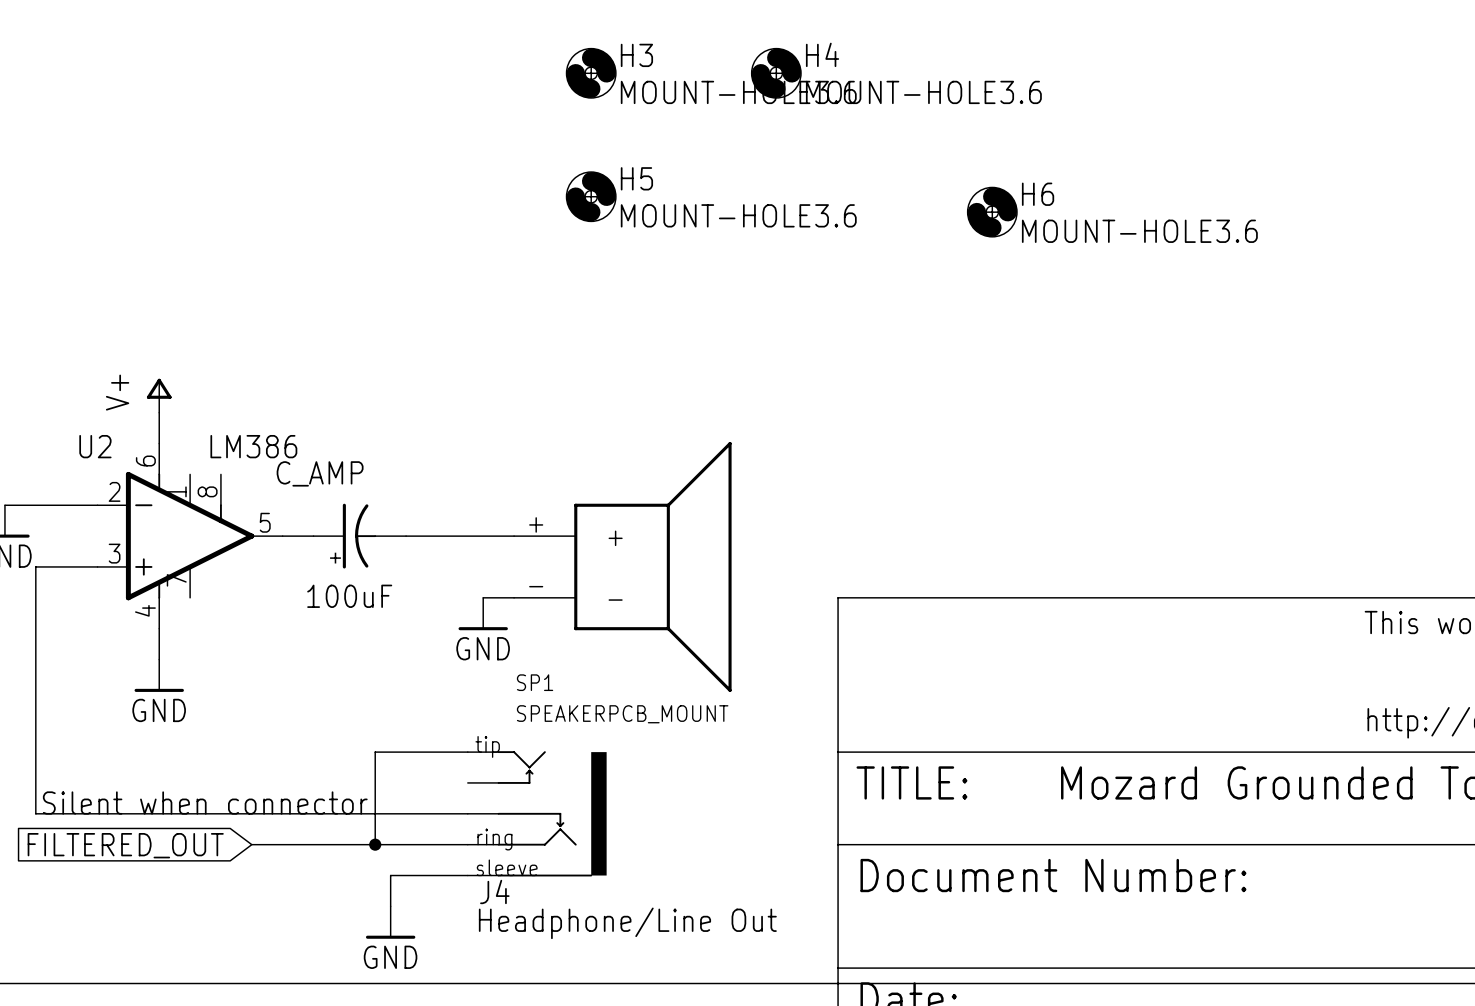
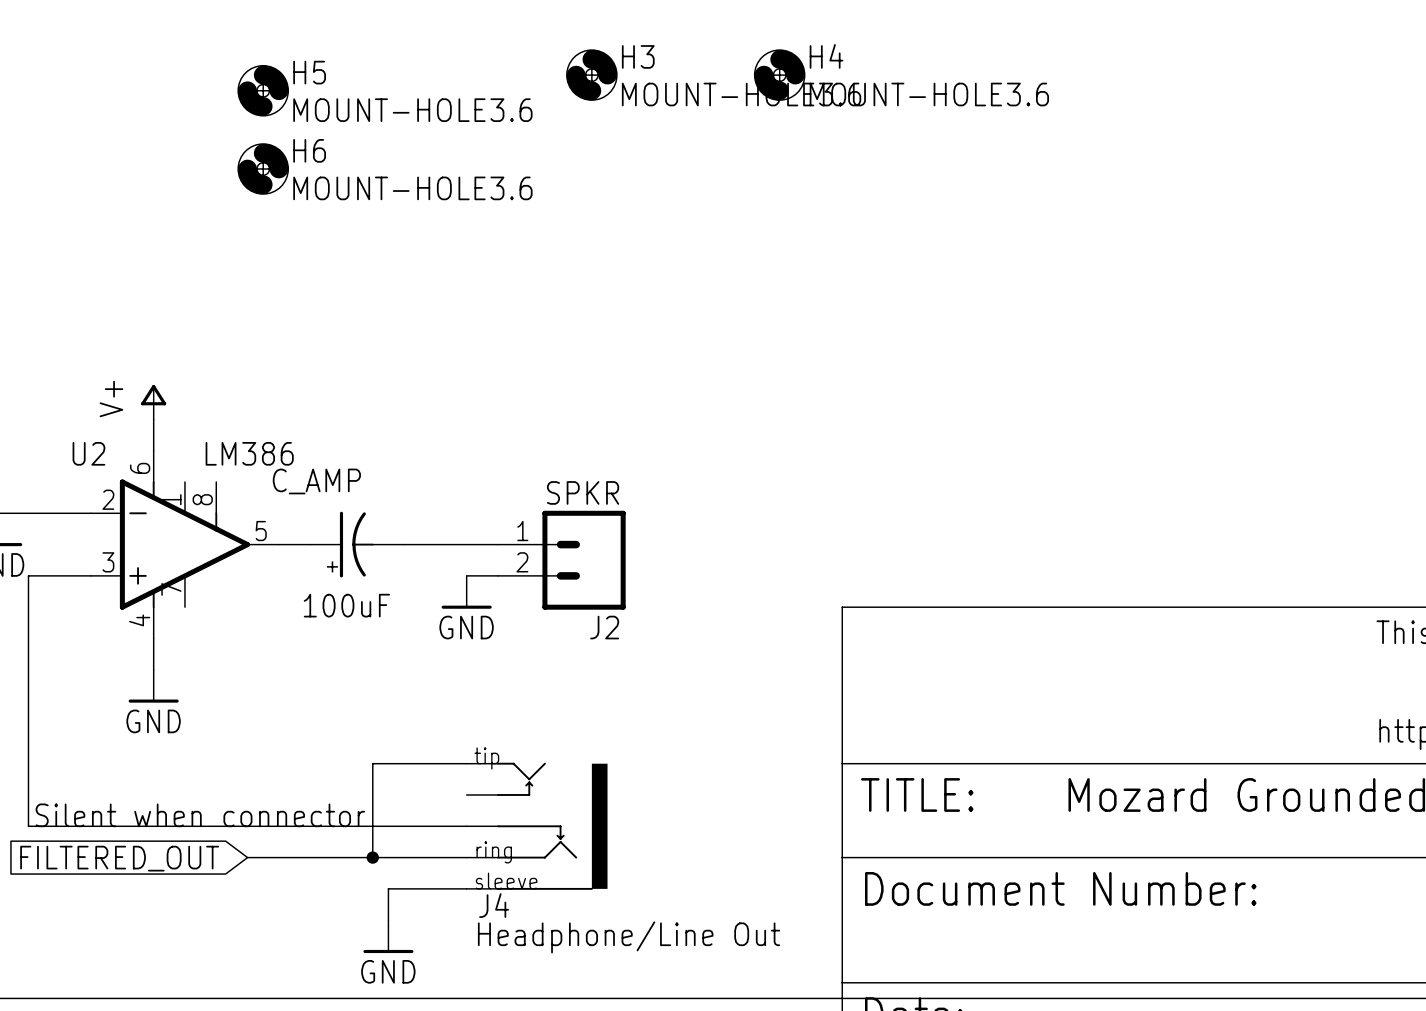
H5 position: (591, 196) -> (263, 90)
H6 position: (992, 212) -> (263, 169)
J2: none -> SPKR (561, 560)
SP1: SPEAKERPCB_MOUNT (622, 566) -> none
wire: (483, 597) (514, 597) -> (466, 575) (497, 575)
power symbol position: GND (483, 614) -> GND (466, 592)

